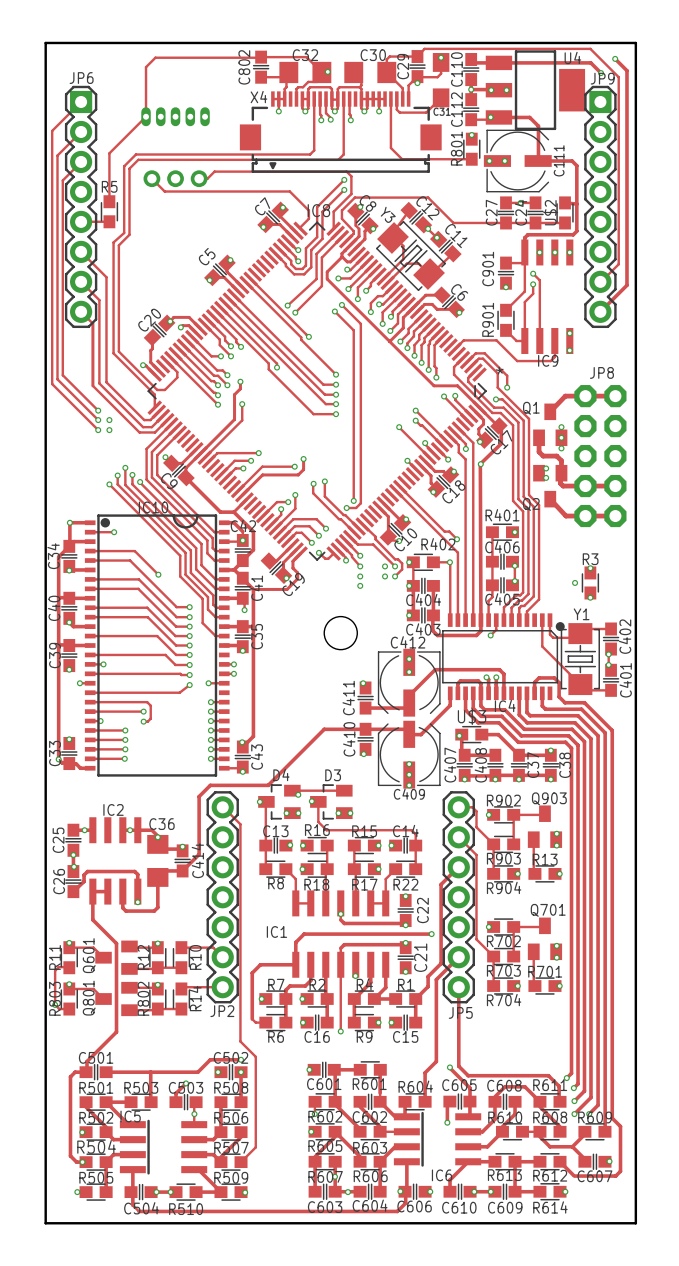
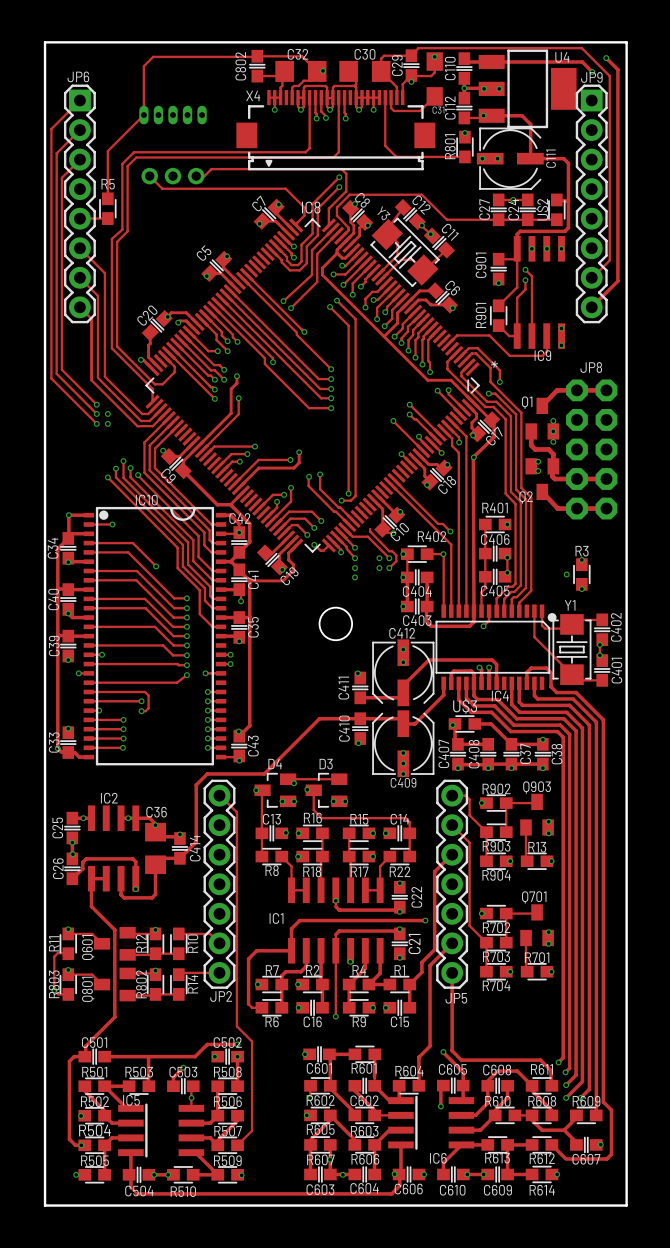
track: (362, 524) (375, 536) -> none

